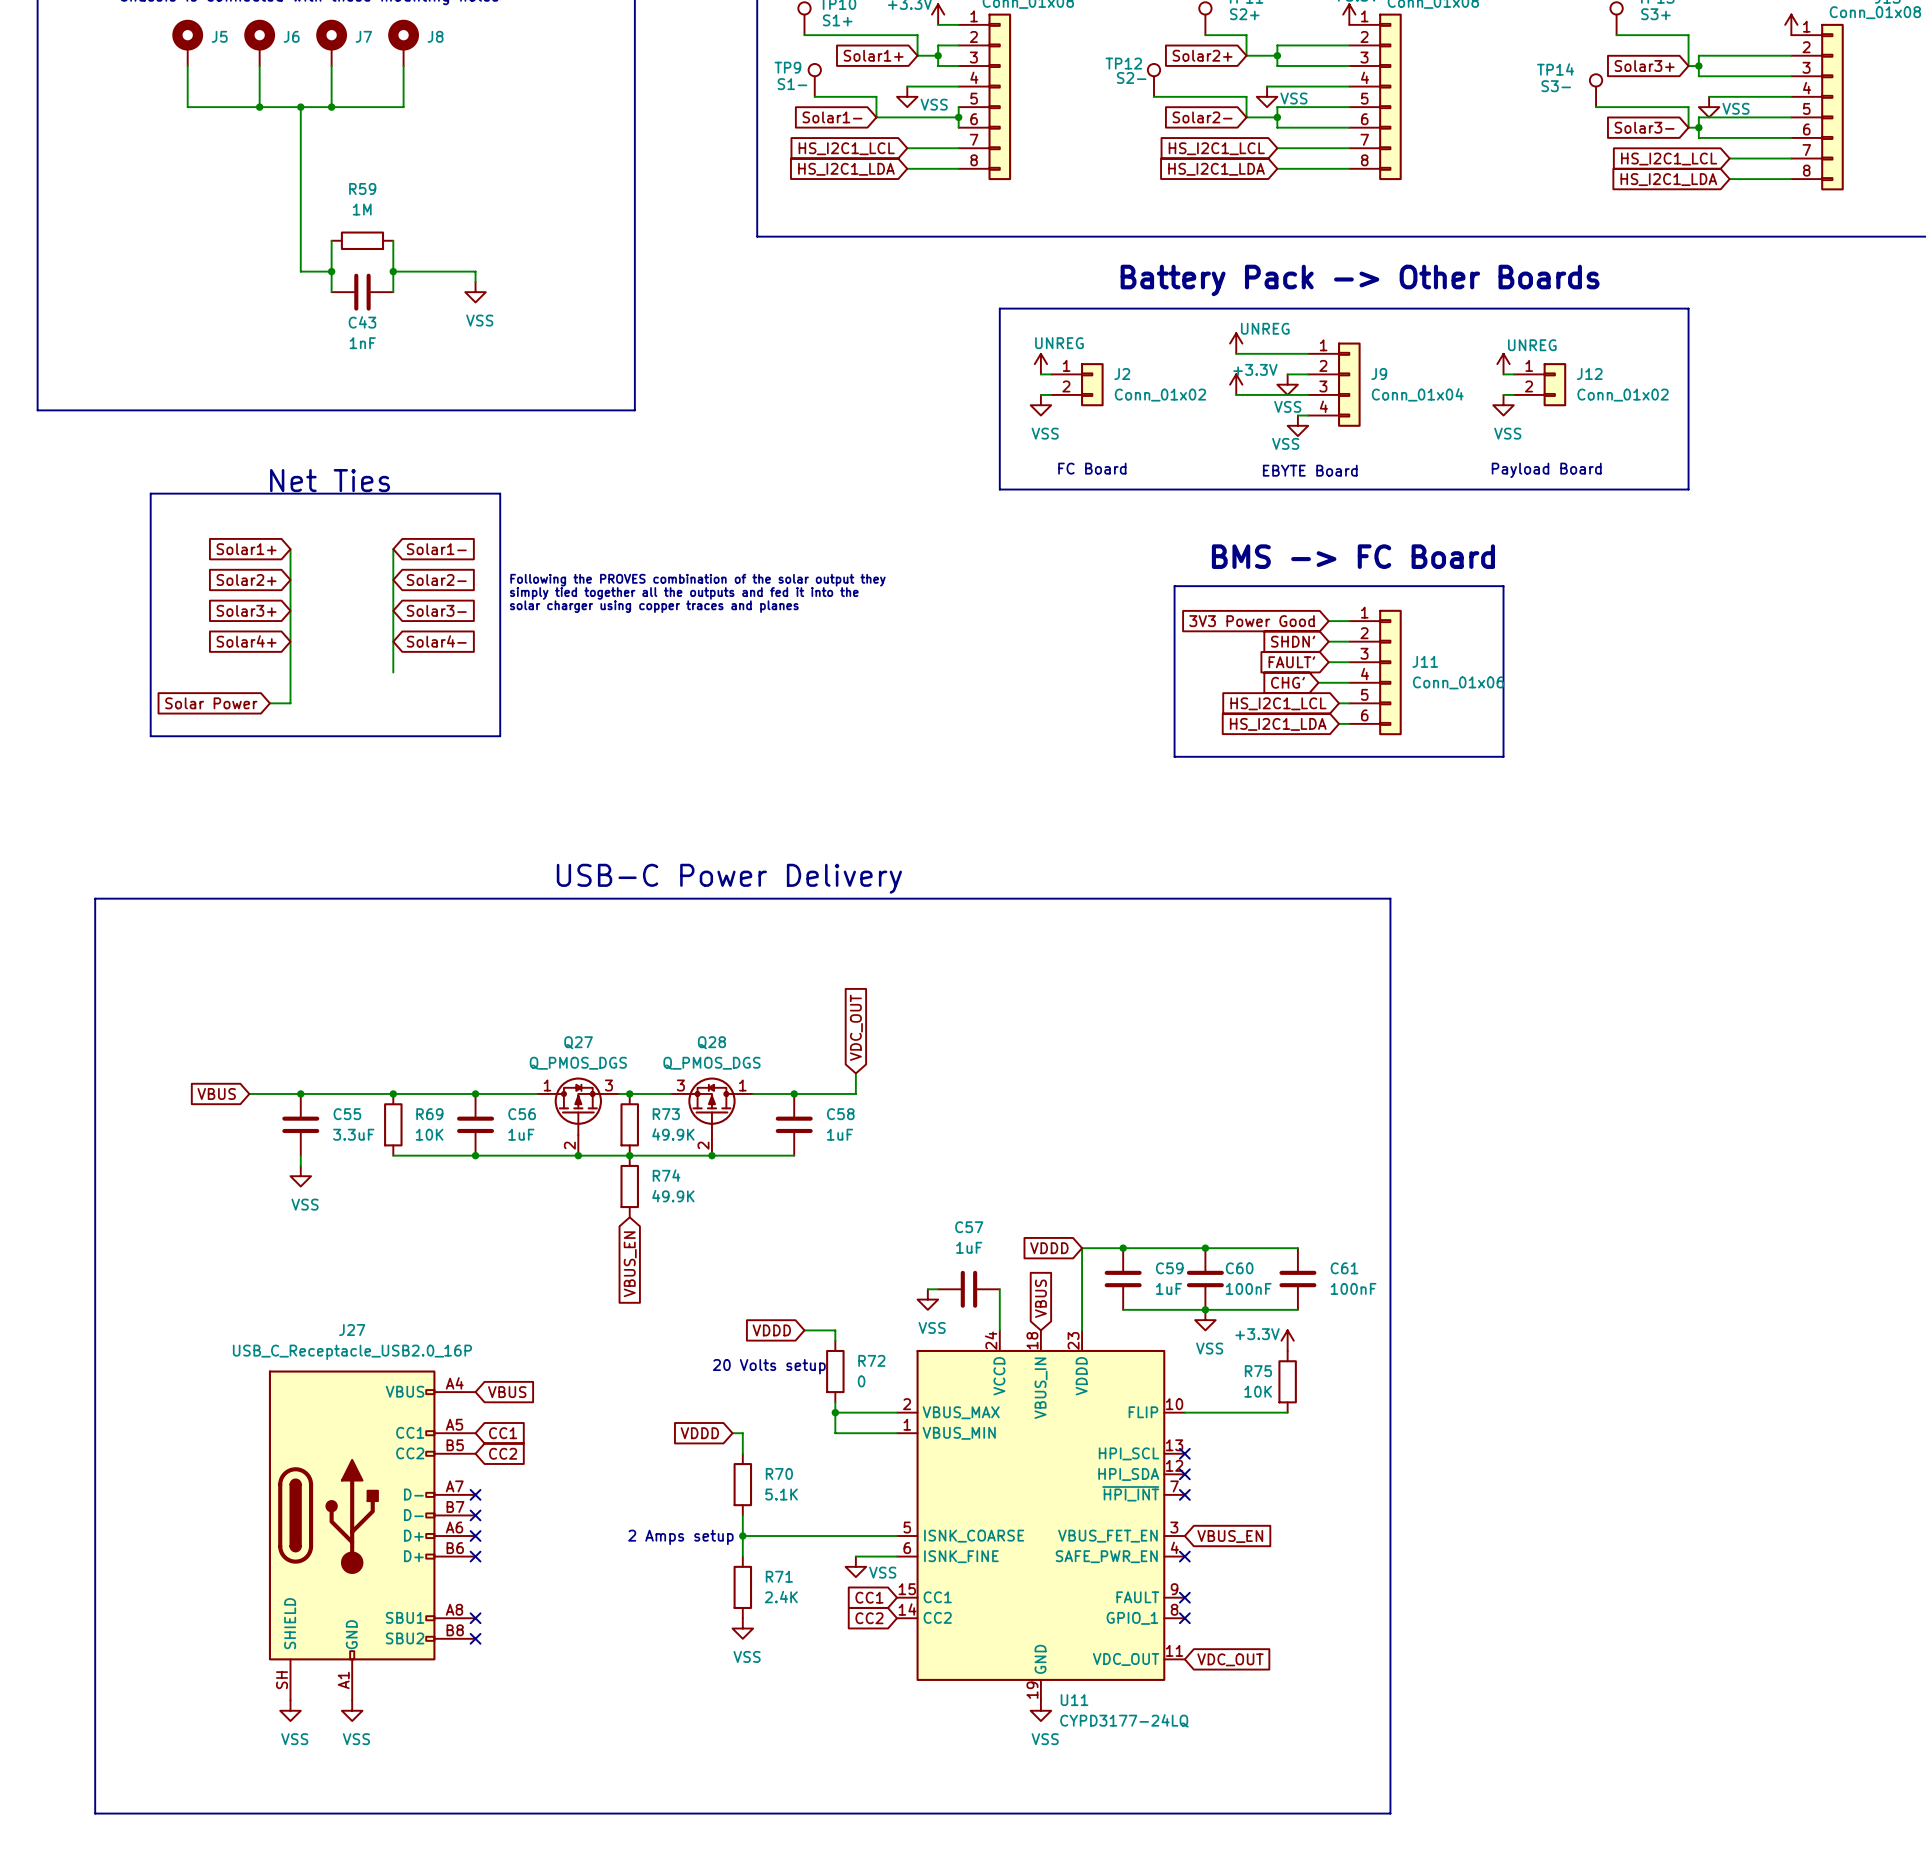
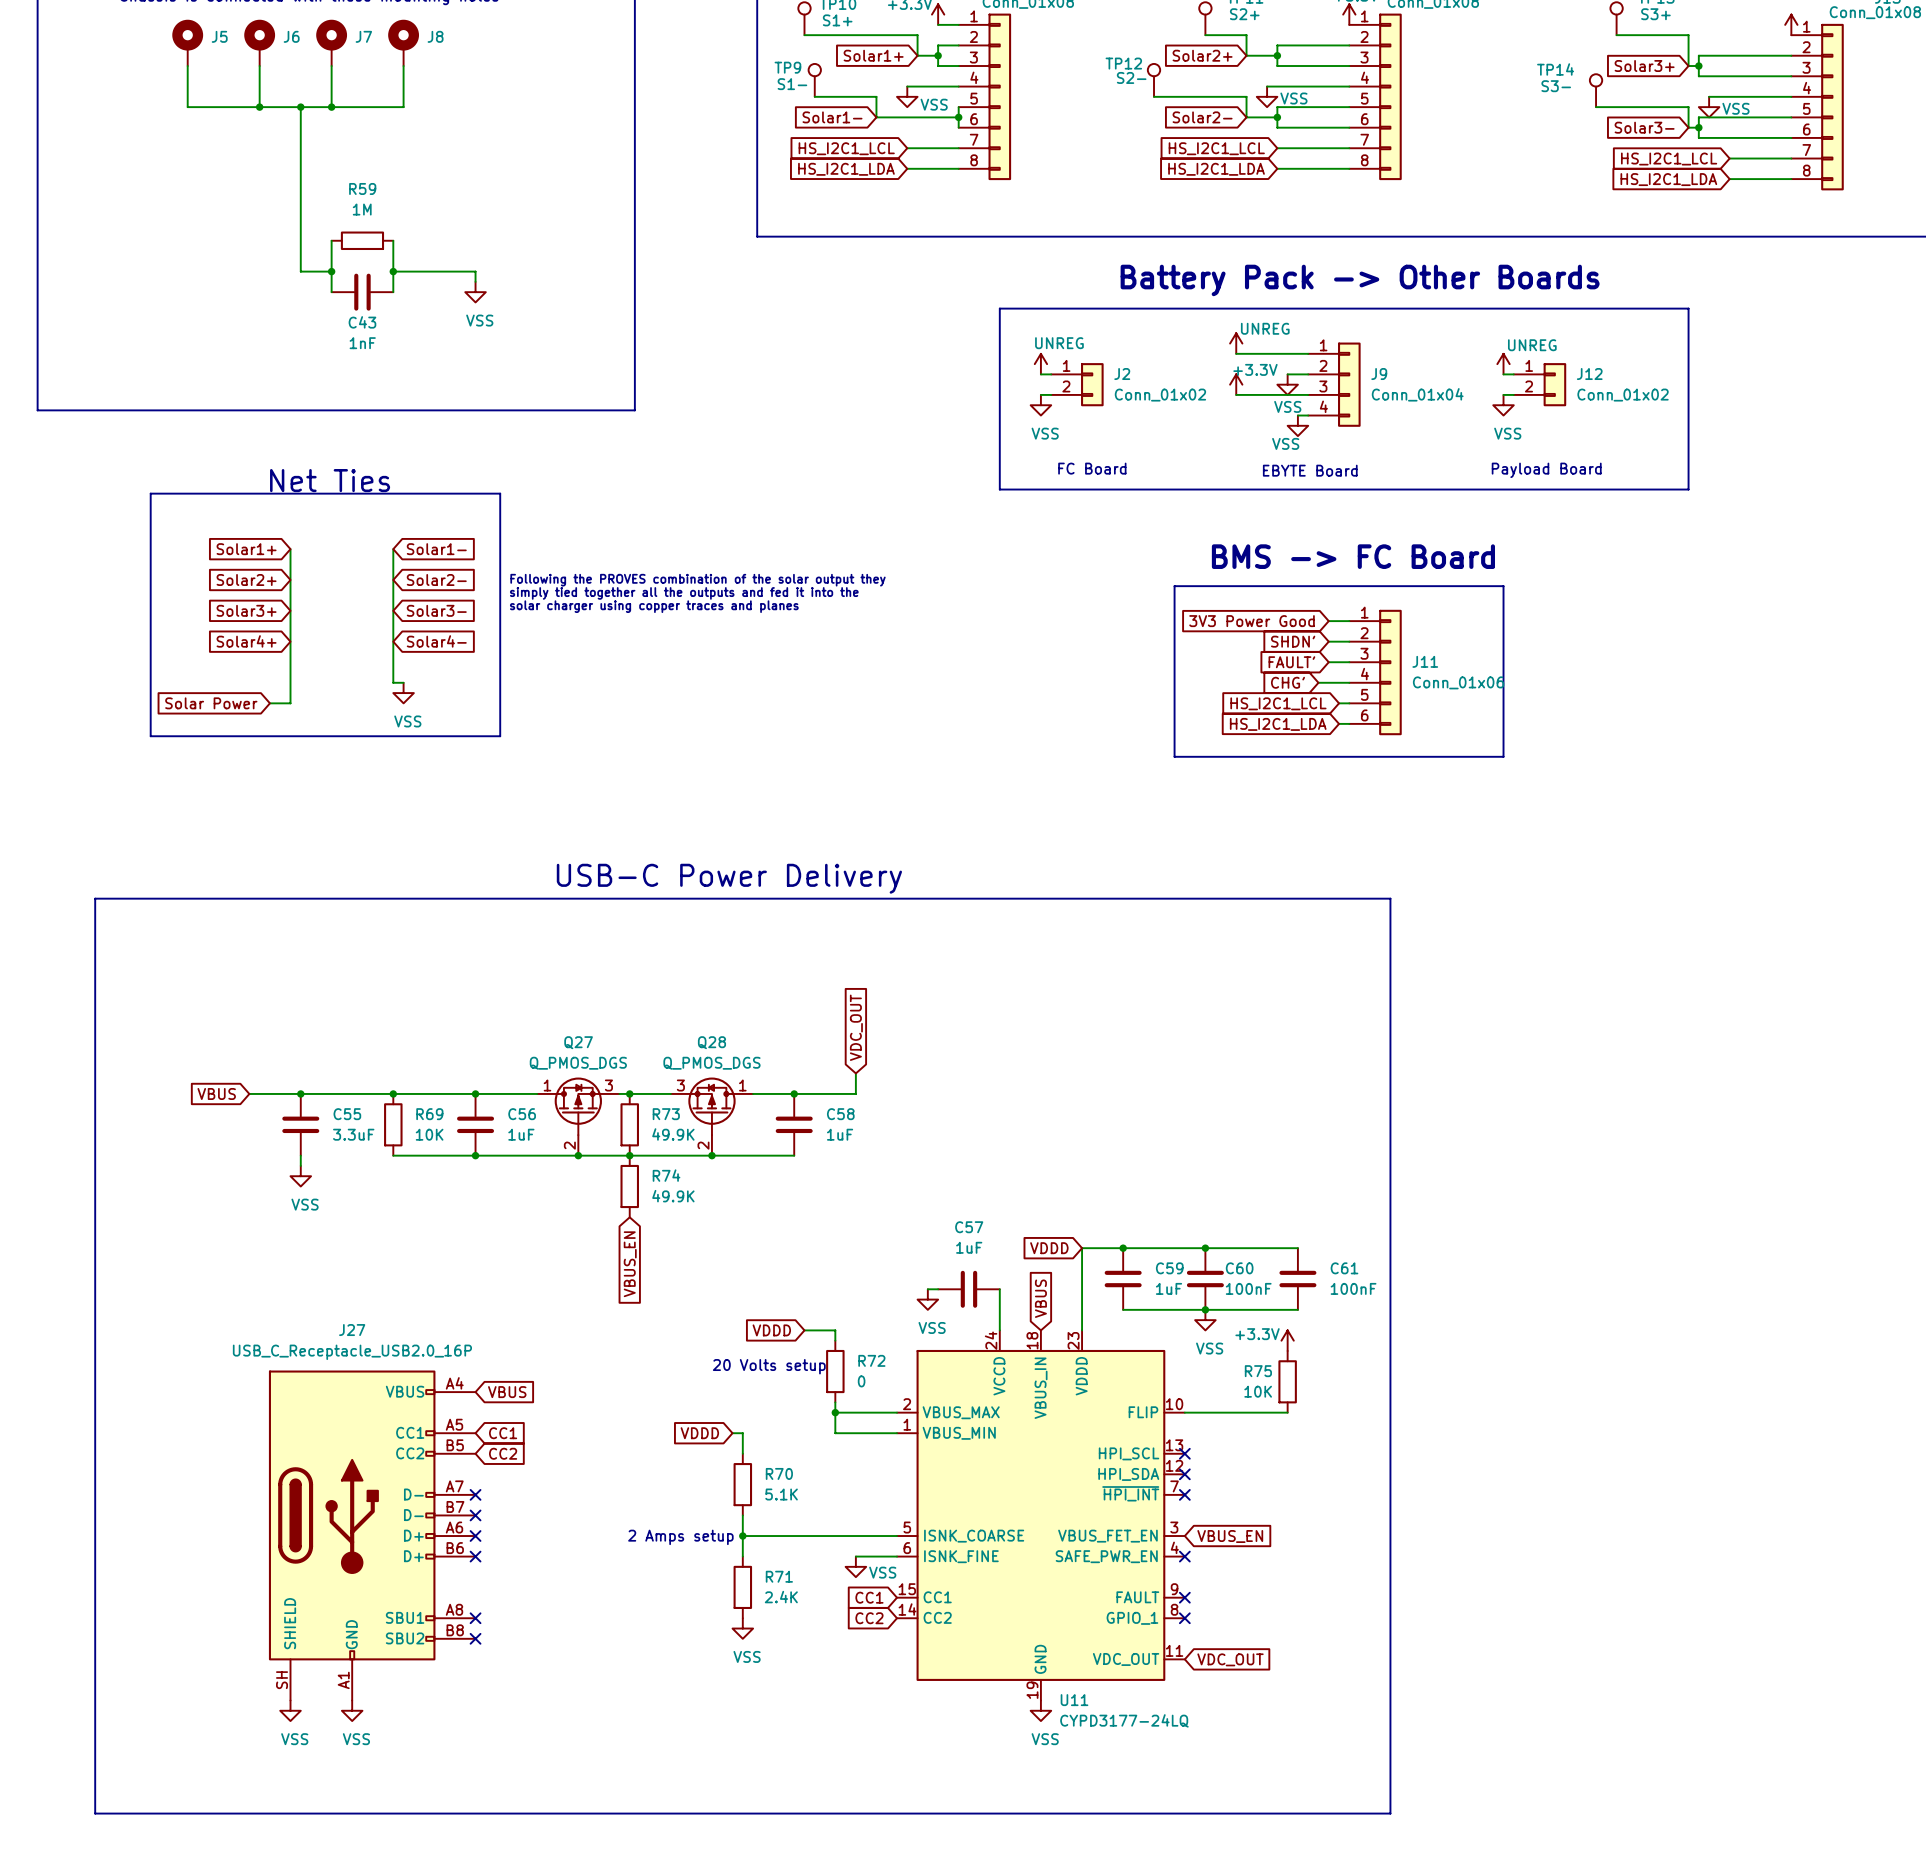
wire: none -> (393, 672) (393, 682) (403, 682)
power symbol: none -> VSS (403, 693)

